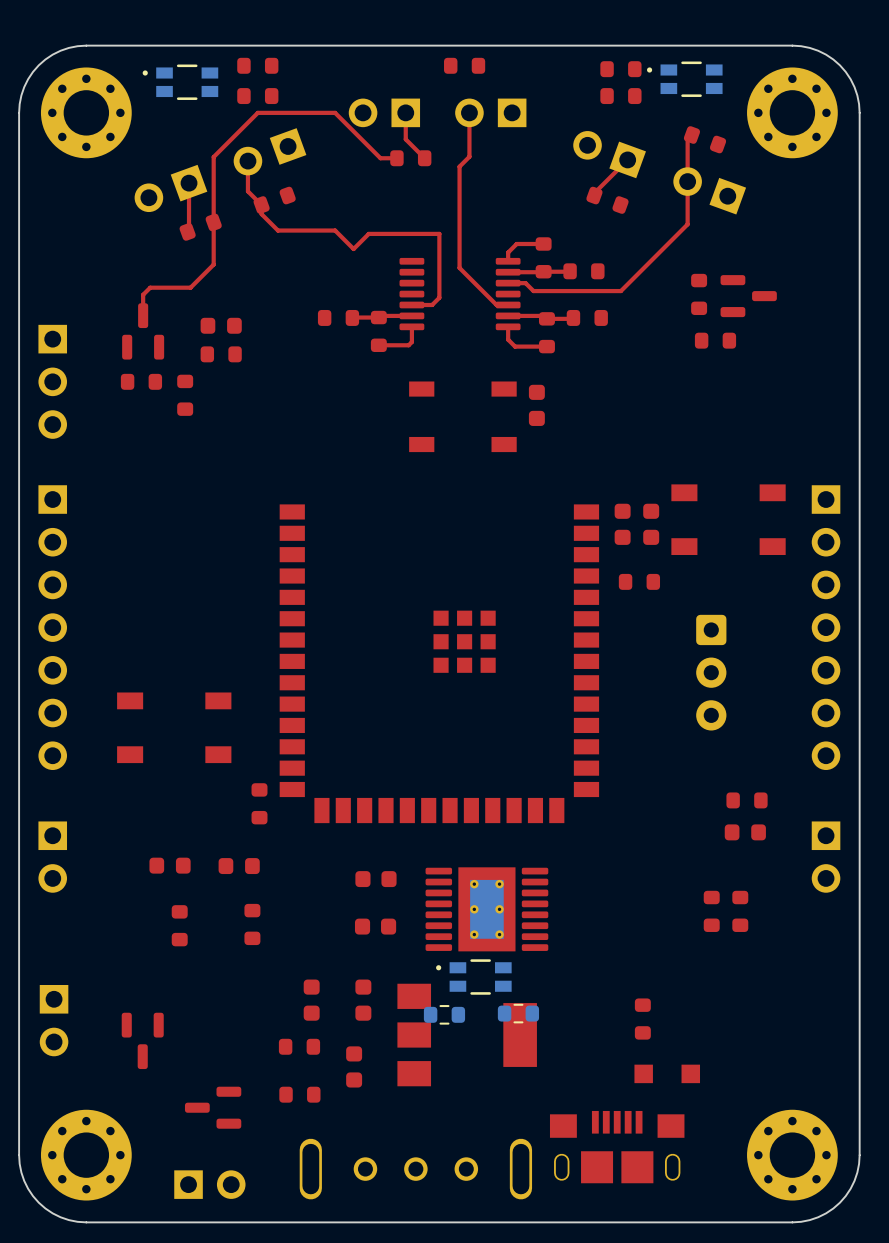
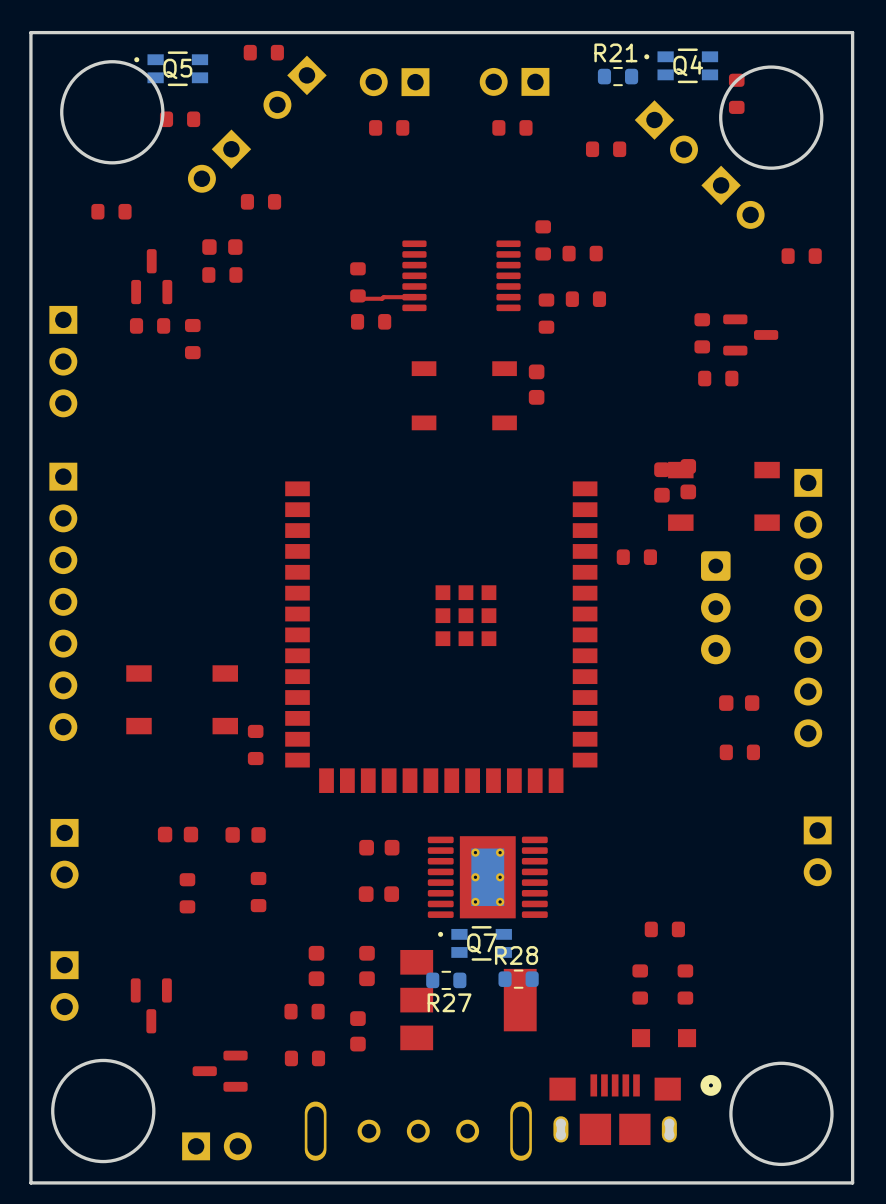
board edge: (792, 45) (86, 45) (68, 47) (52, 54) (38, 65) (28, 79) (21, 95) (19, 112) (19, 1155) (21, 1172) (28, 1188) (38, 1202) (52, 1213) (68, 1220) (86, 1222) (792, 1222) (809, 1220) (826, 1213) (839, 1202) (850, 1188) (857, 1172) (859, 1155) (859, 112) (854, 87) (839, 65) (818, 50) (792, 45) -> (852, 32) (852, 1182) (30, 1182) (30, 32) (852, 32)
part: (464, 65) -> none
R21 side: top (620, 69) -> bottom (618, 76)
round board edge: none -> [60, 60, 165, 165]
round board edge: none -> [719, 65, 824, 170]
Q4 name: none -> Q4 (688, 65)
Q5: none -> (171, 68)
part: (180, 82) -> none
part: (257, 96) -> none
part: (620, 96) -> none
part: none -> (295, 87)
part: none -> (736, 93)
part: (86, 112) -> none
part position: (384, 112) -> (394, 82)
top track: (405, 112) (405, 139) (424, 158) -> none
top track: (469, 112) (469, 156) (459, 166) (459, 267) (496, 304) (508, 304) -> none
part position: (490, 112) -> (514, 81)
part: (792, 112) -> none
part footprint: [573, 131, 646, 179] -> [585, 141, 627, 158]
part: none -> (180, 119)
top track: (691, 135) (687, 139) (687, 224) (620, 291) (533, 291) (525, 283) (508, 283) -> none
part: (704, 139) -> none
part: none -> (512, 127)
part: none -> (666, 131)
part: (270, 151) -> none
top track: (396, 158) (380, 158) (335, 112) (257, 112) (213, 156) (213, 264) (190, 287) (150, 287) (143, 294) (143, 315) -> none
part position: (410, 158) -> (389, 127)
top track: (627, 159) (594, 193) (594, 195) -> none
top track: (247, 161) (247, 191) (261, 205) (261, 214) (277, 230) (335, 230) (353, 249) (368, 233) (439, 233) (439, 297) (432, 304) (411, 304) -> none
part: none -> (219, 161)
top track: (189, 183) (187, 231) -> none
part: (170, 188) -> none
part: (709, 190) -> none
part: (274, 200) -> none
part: (607, 200) -> none
part: none -> (732, 197)
part: none -> (261, 201)
part: (200, 227) -> none
part: none -> (111, 211)
top track: (542, 244) (516, 243) (508, 252) (508, 261) -> none
top track: (570, 271) (508, 272) -> none
part: none -> (801, 256)
part: none -> (222, 274)
part: none -> (151, 276)
part: (699, 294) -> none
part position: (748, 296) -> (750, 334)
part footprint: [122, 303, 165, 360] -> [129, 318, 171, 334]
top track: (508, 315) (544, 315) (546, 318) (573, 317) -> none
part rotation: 0° (338, 317) -> 90° clockwise (357, 282)
part position: (221, 325) -> (222, 247)
top track: (411, 326) (411, 342) (408, 345) (378, 345) -> none
top track: (508, 326) (508, 339) (515, 346) (546, 346) -> none
part rotation: 0° (378, 331) -> 90° clockwise (371, 321)
part rotation: 0° (715, 340) -> 90° clockwise (702, 333)
part: (221, 354) -> none
part: none -> (192, 339)
part: (141, 381) -> none
part: (185, 395) -> none
part: none -> (718, 378)
part: none -> (688, 479)
part: none -> (661, 482)
part: (622, 524) -> none
part: (651, 524) -> none
part position: (826, 627) -> (808, 608)
part position: (711, 672) -> (715, 607)
part position: (747, 800) -> (739, 752)
part position: (259, 803) -> (255, 744)
part position: (745, 832) -> (739, 703)
part position: (52, 857) -> (64, 853)
part position: (826, 857) -> (817, 851)
part: (711, 911) -> none
part: (740, 911) -> none
part: none -> (664, 929)
Q7 name: none -> Q7 (482, 943)
R28 name: none -> R28 (516, 955)
part: none -> (685, 984)
R27 name: none -> R27 (449, 1002)
round board edge: none -> [51, 1058, 156, 1164]
round board edge: none -> [729, 1061, 834, 1167]
part: (617, 1147) -> none
part: none -> (635, 1109)
part: (86, 1155) -> none
part: (792, 1155) -> none

